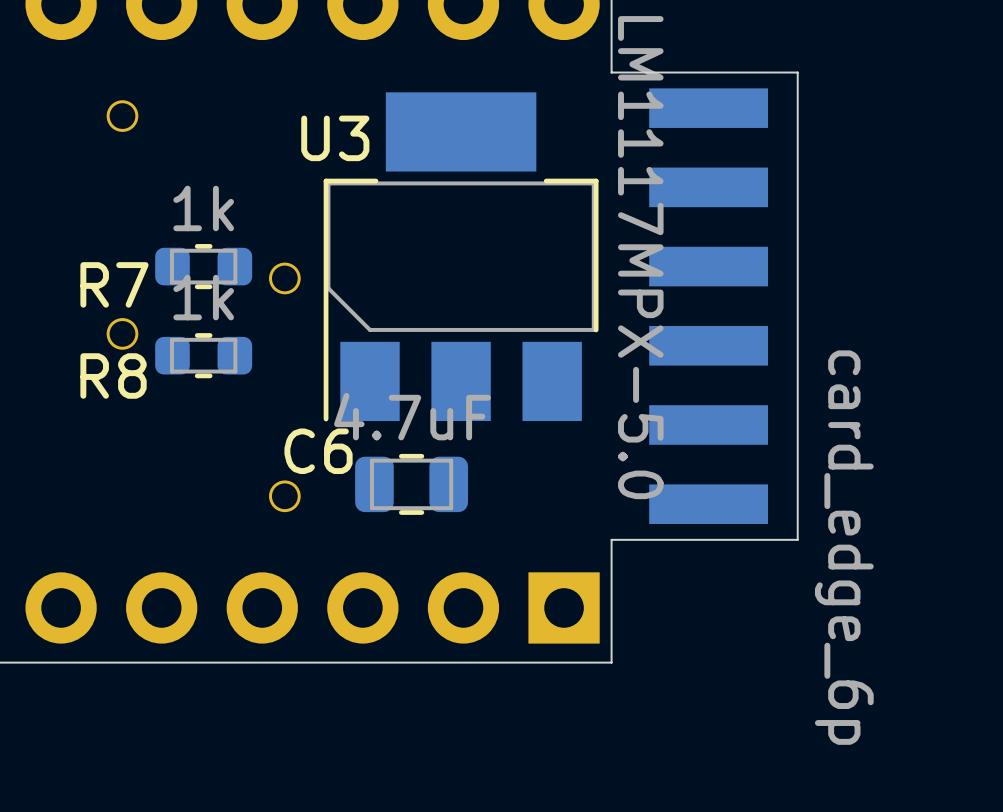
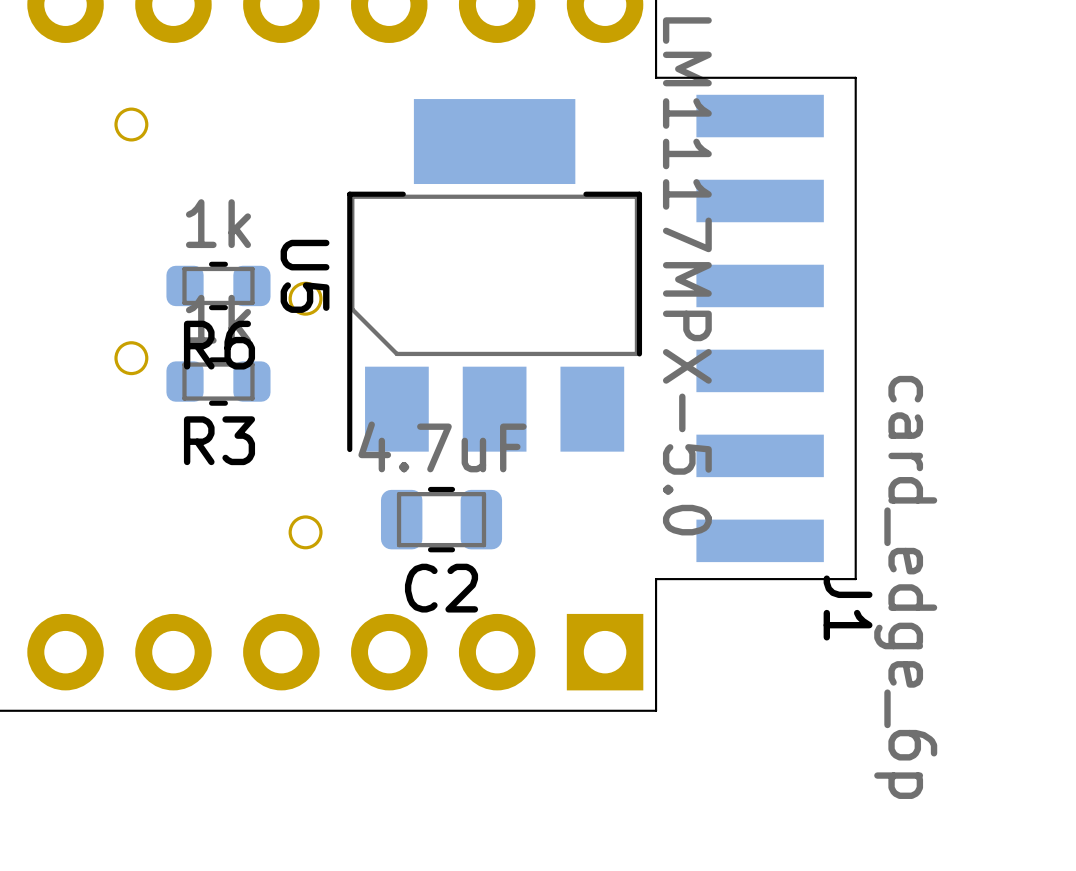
U3 name: U3 (335, 138) -> U5 (305, 276)
R7 name: R7 (114, 284) -> R6 (219, 345)
R8 name: R8 (113, 375) -> R3 (219, 440)
C6 name: C6 (318, 451) -> C2 (441, 588)
J1 name: none -> J1 (848, 607)

